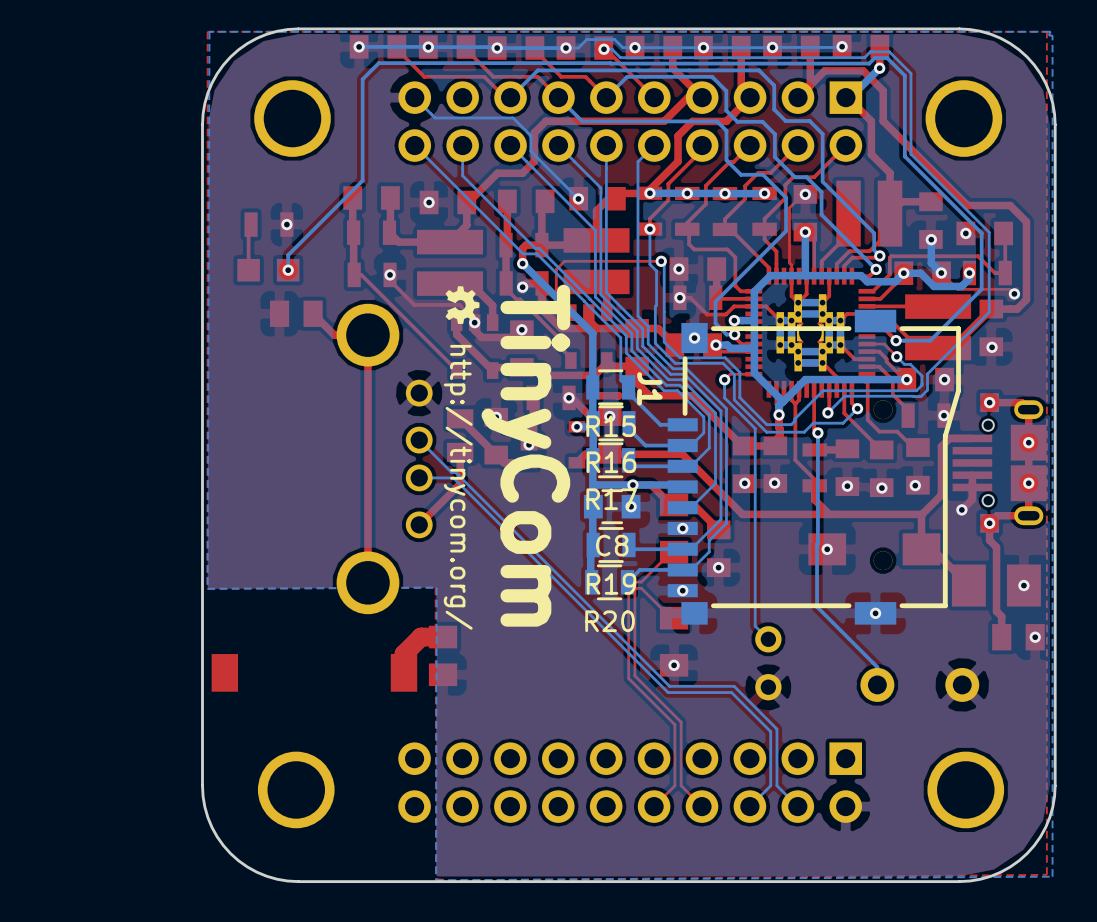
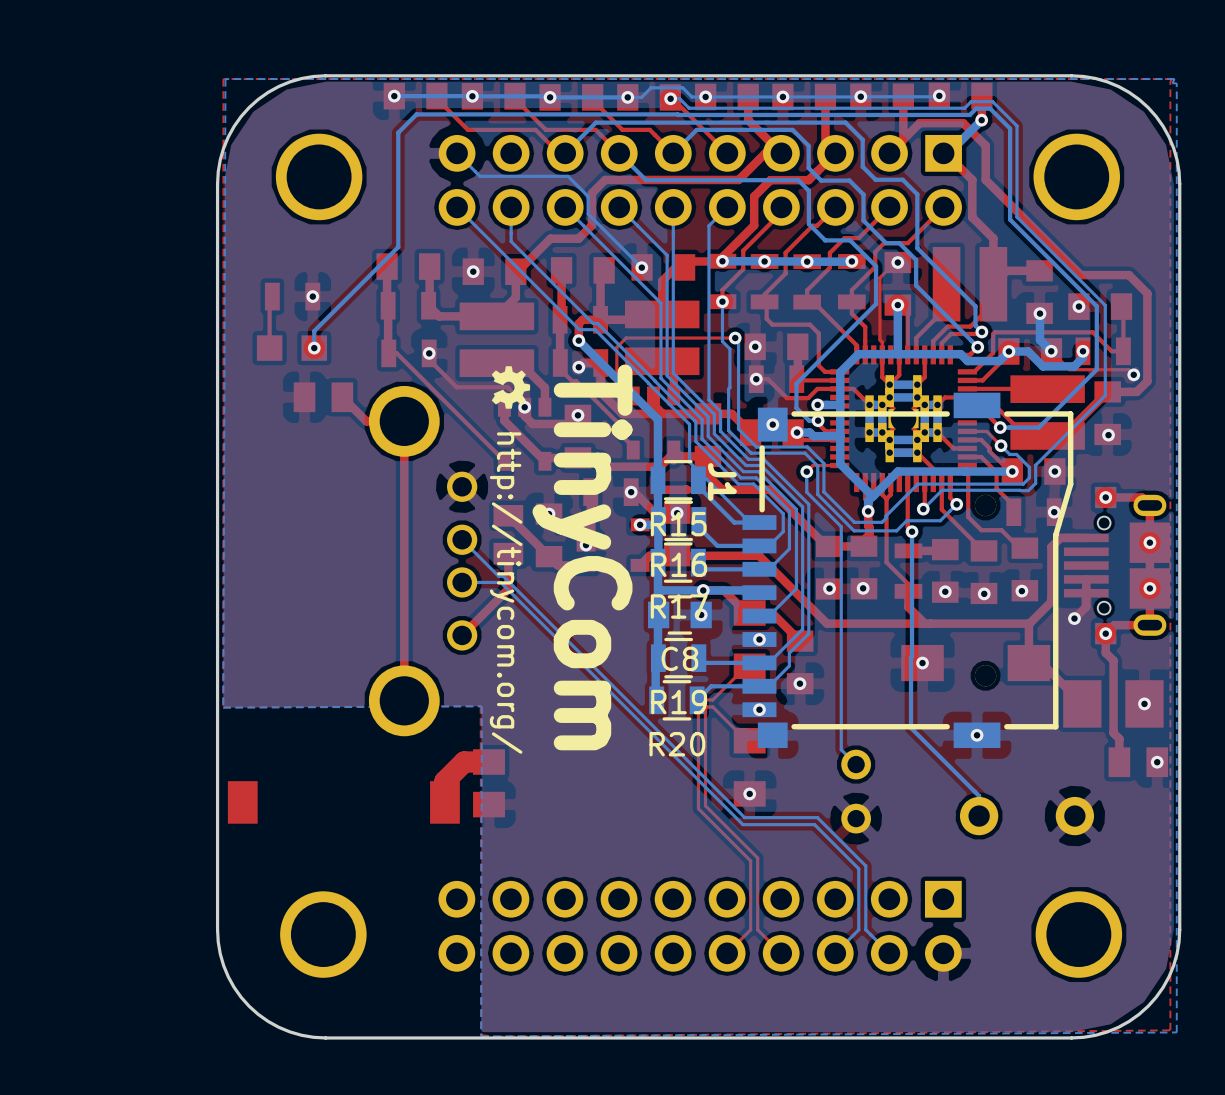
bottom track: (620, 371) (620, 380) (628, 387) -> (689, 462) (749, 522)

